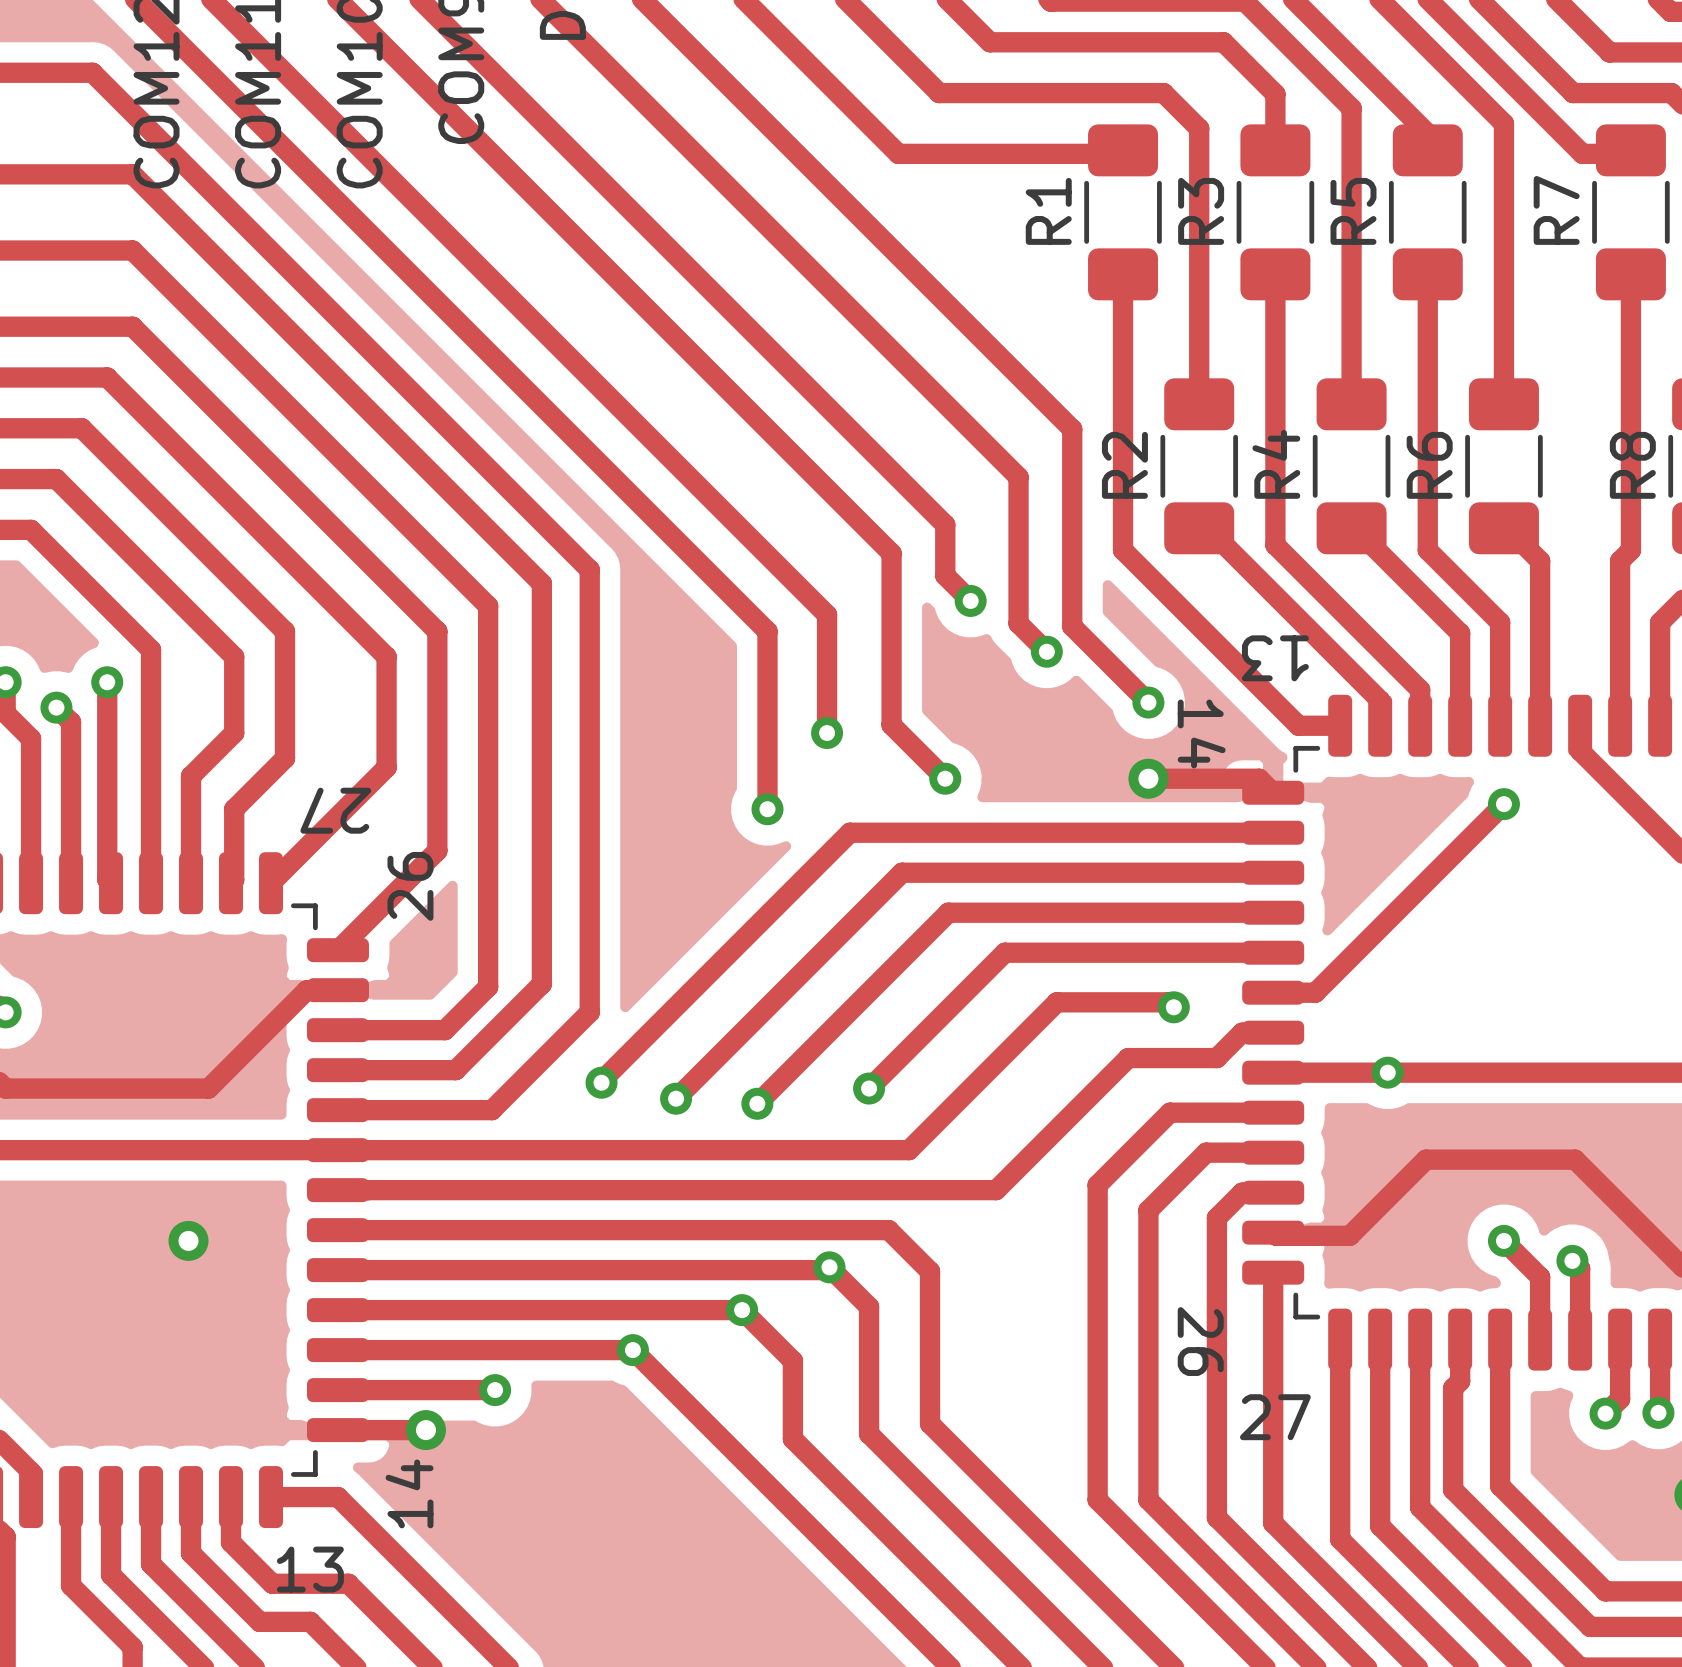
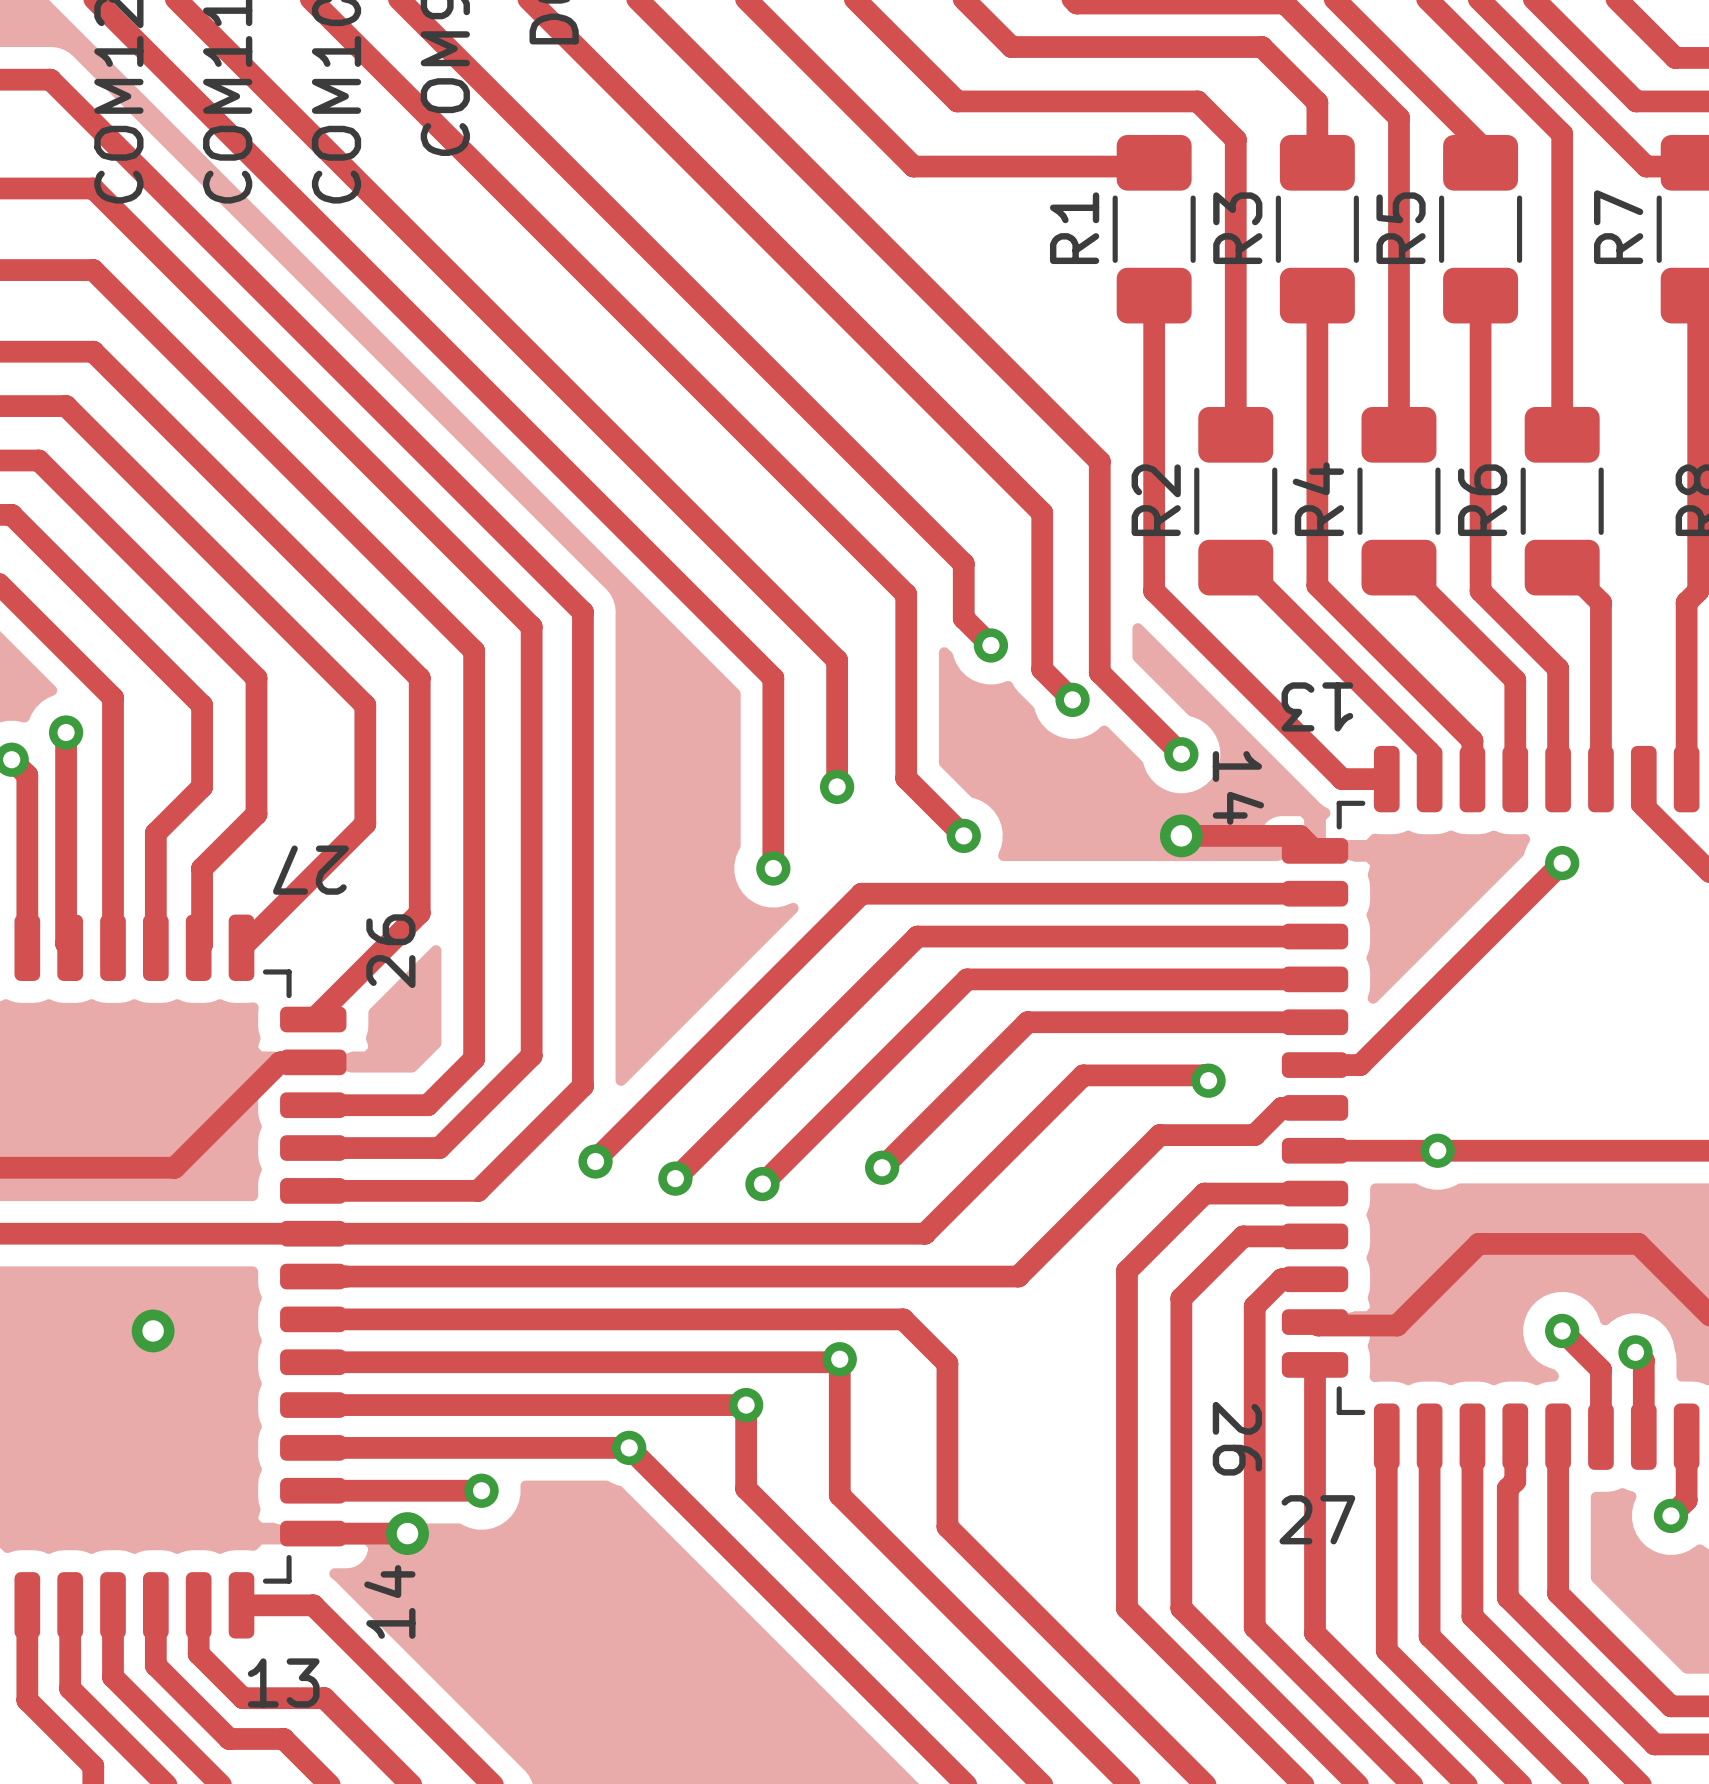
track: (829, 1267) (869, 1306) (869, 1433) -> (839, 1359) (839, 1495) (882, 1537)
track: (742, 1310) (792, 1360) (792, 1439) -> (746, 1405) (746, 1488) (800, 1543)

